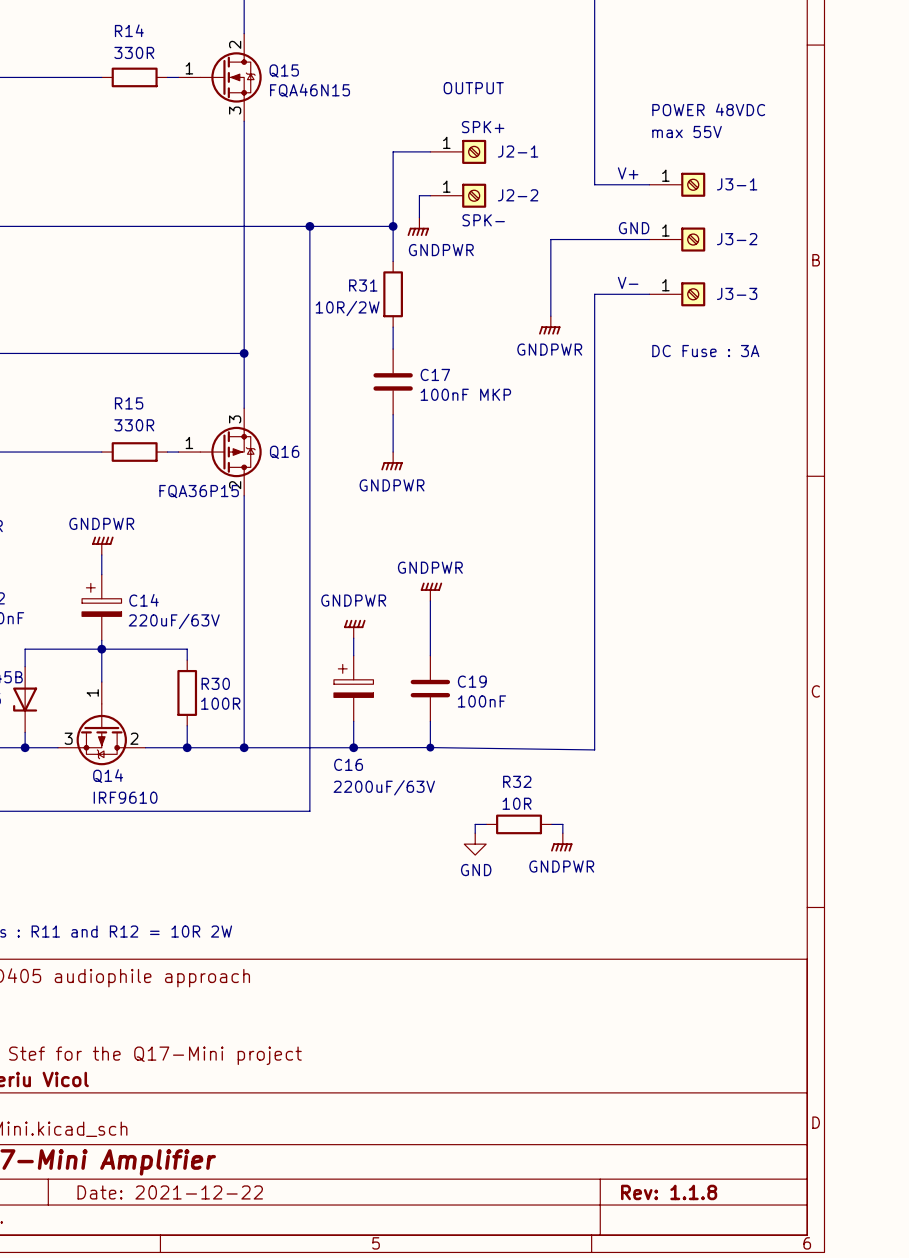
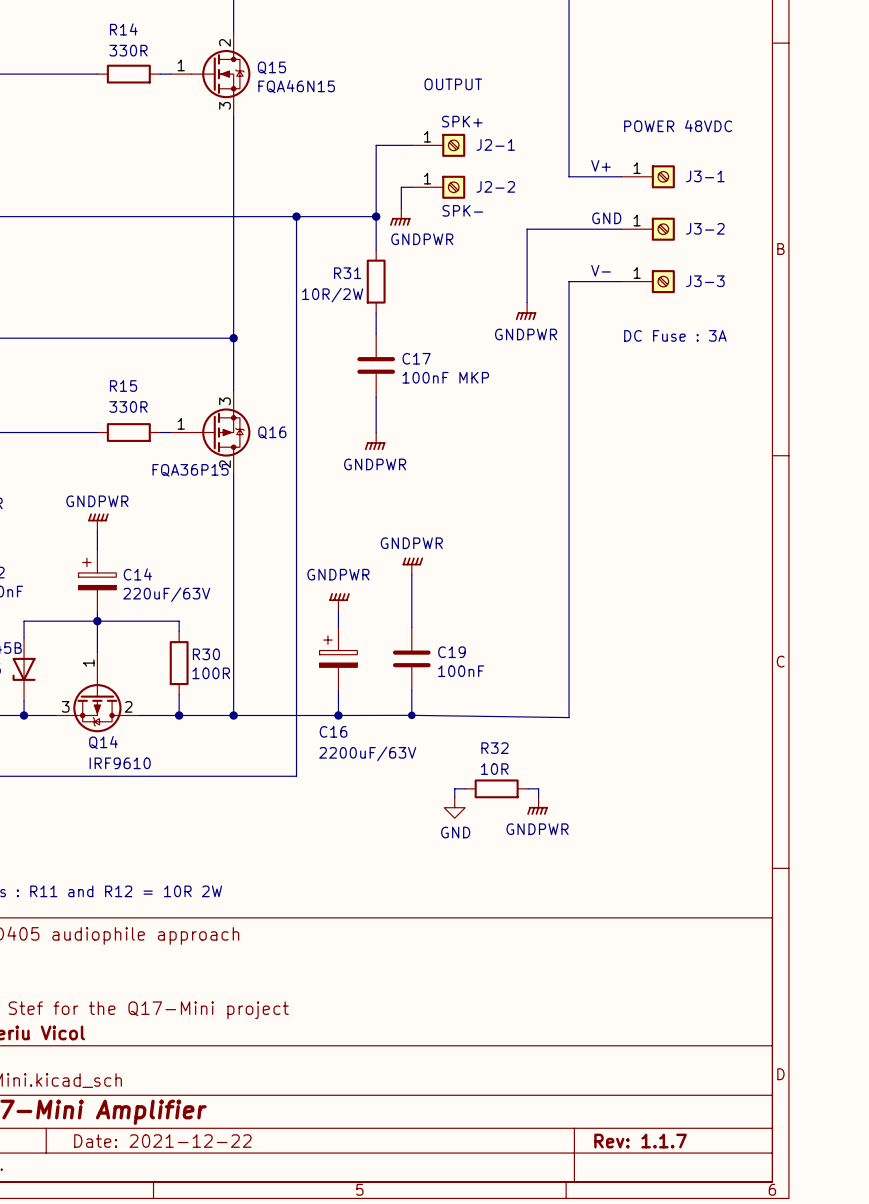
text: POWER 48VDC (708, 109) -> none
text: max 55V (687, 131) -> POWER 48VDC (678, 126)
title block: Rev: 1.1.8 (669, 1192) -> Rev: 1.1.7 (640, 1141)

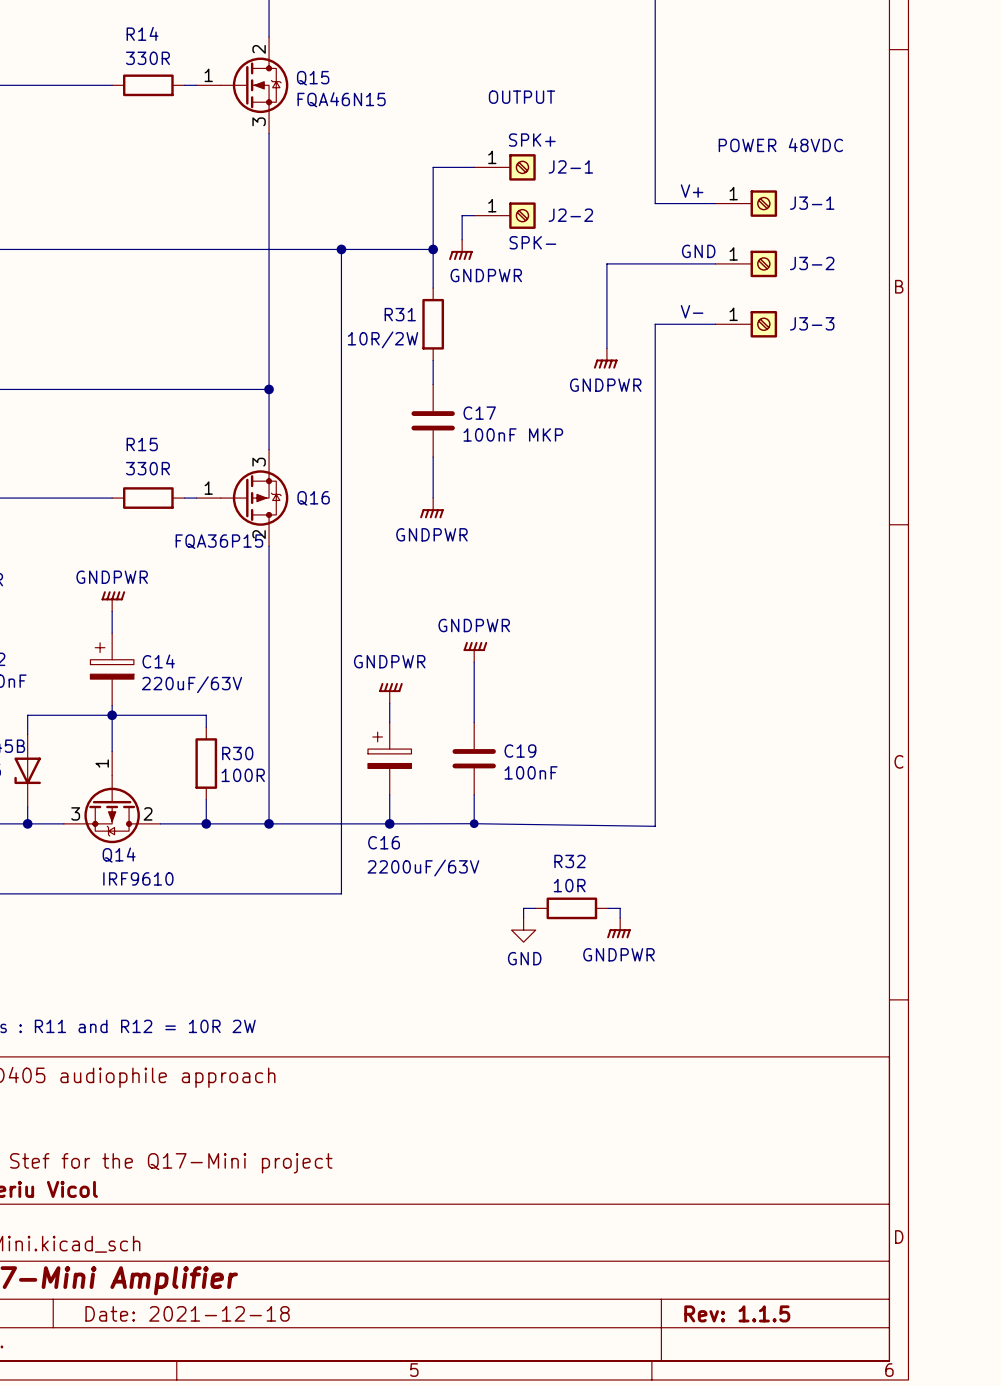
text: DC Fuse : 3A (675, 335) -> none
title block: Date: 2021-12-22 (162, 1141) -> Date: 2021-12-18 (187, 1313)
title block: Rev: 1.1.7 (640, 1141) -> Rev: 1.1.5 (737, 1313)

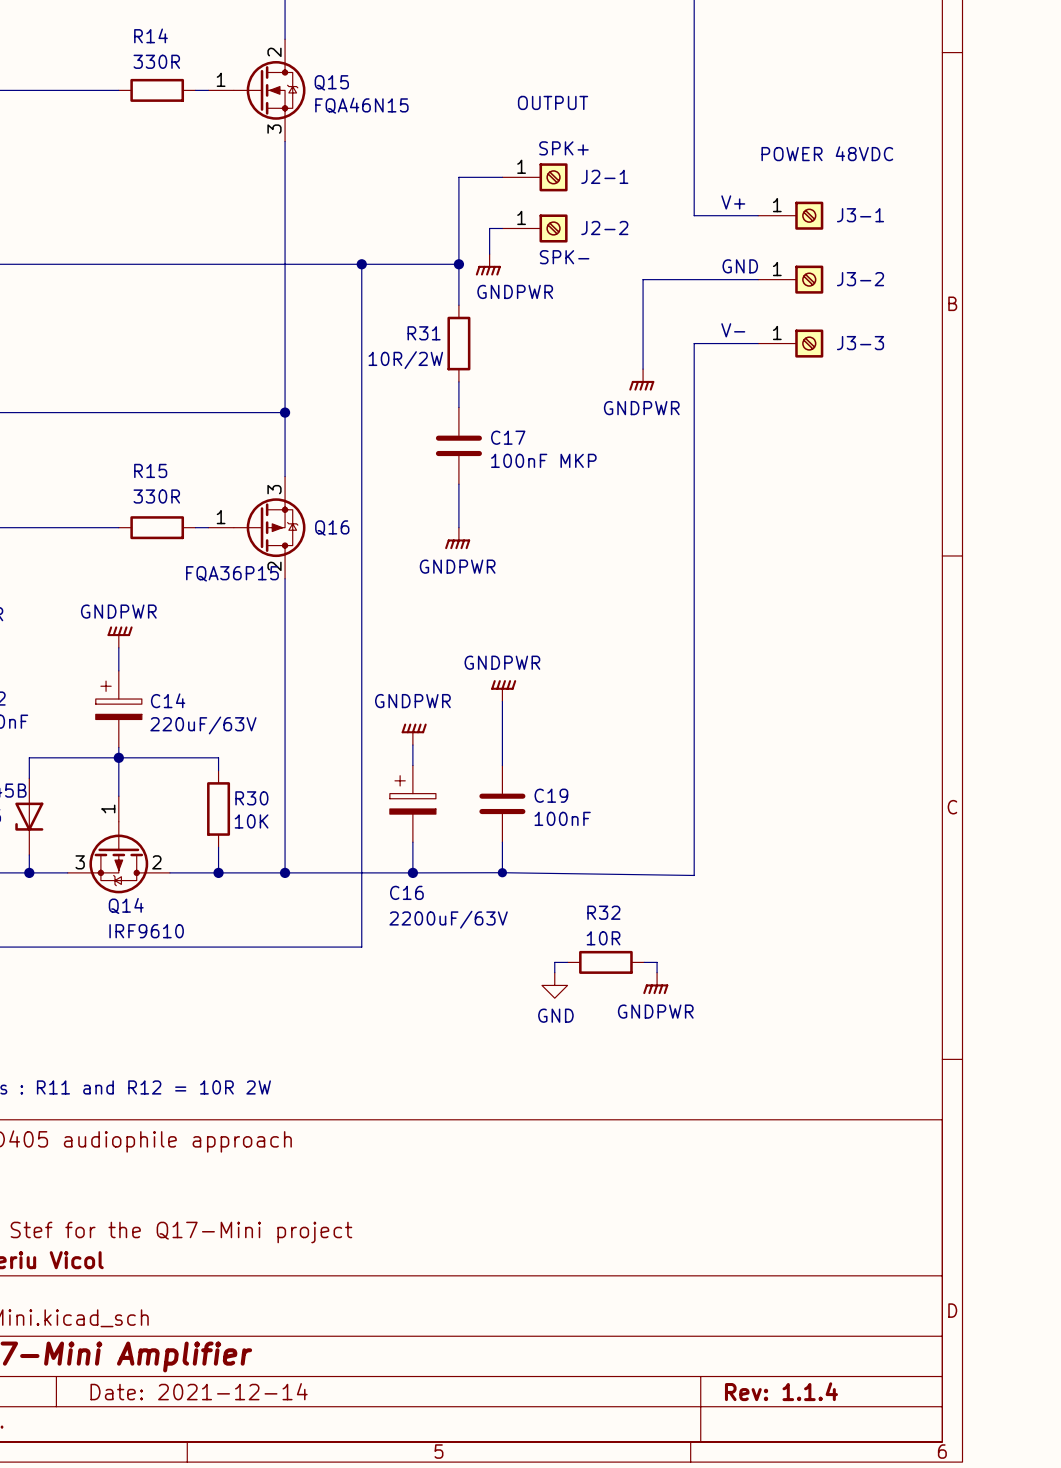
R30 value: 100R (243, 775) -> 10K (251, 821)
title block: Date: 2021-12-18 (187, 1313) -> Date: 2021-12-14 (199, 1391)
title block: Rev: 1.1.5 (737, 1313) -> Rev: 1.1.4 (781, 1391)

